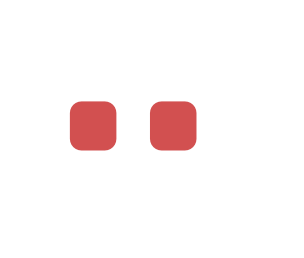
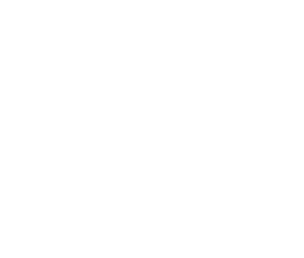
part: (133, 125) -> none

